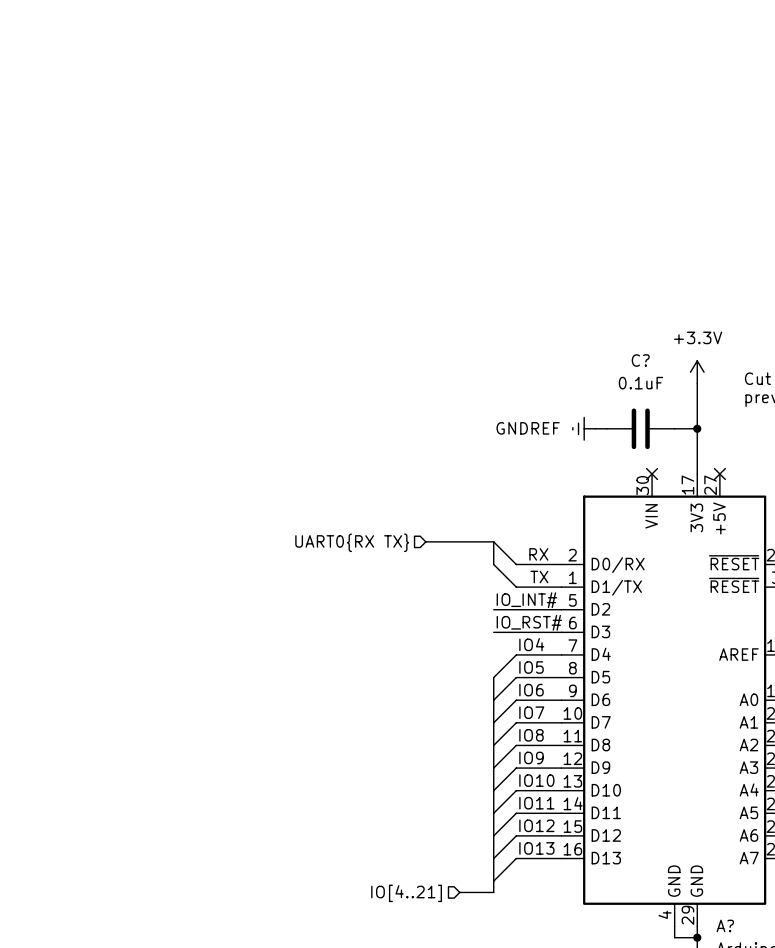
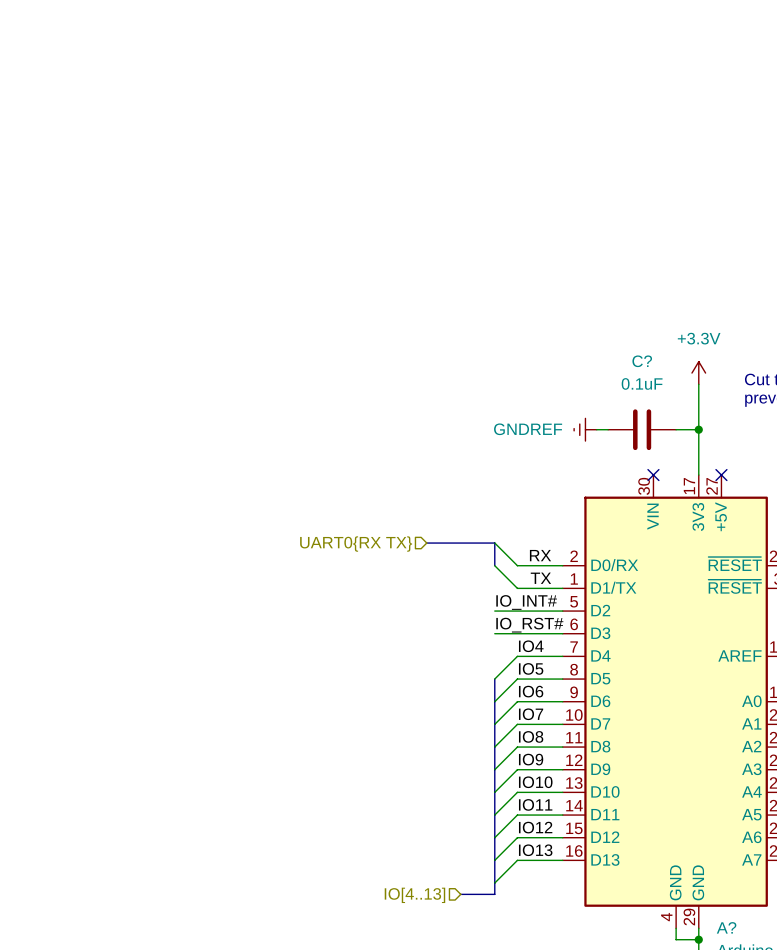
hierarchical label: IO[4..21] (406, 893) -> IO[4..13] (414, 895)

